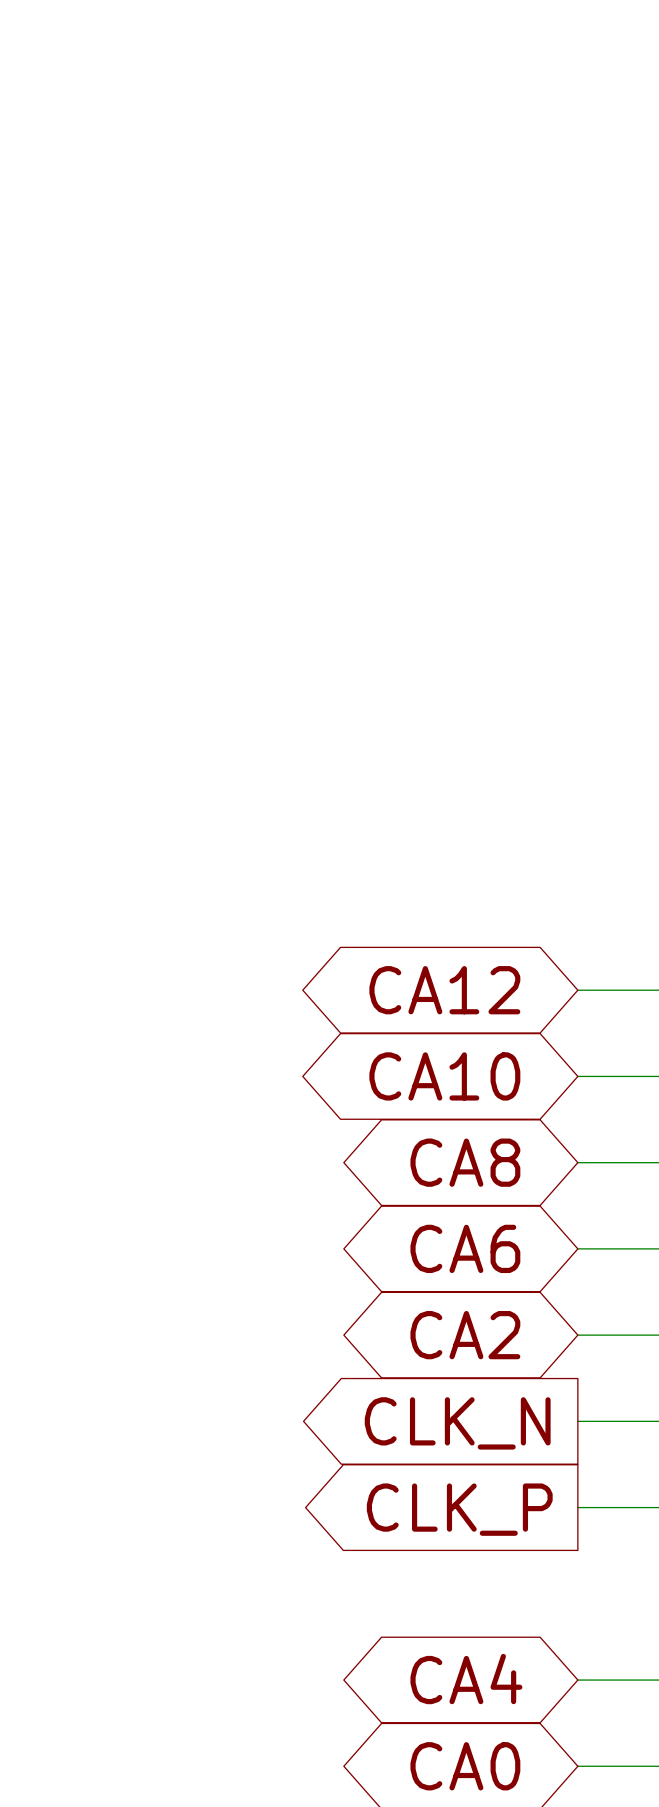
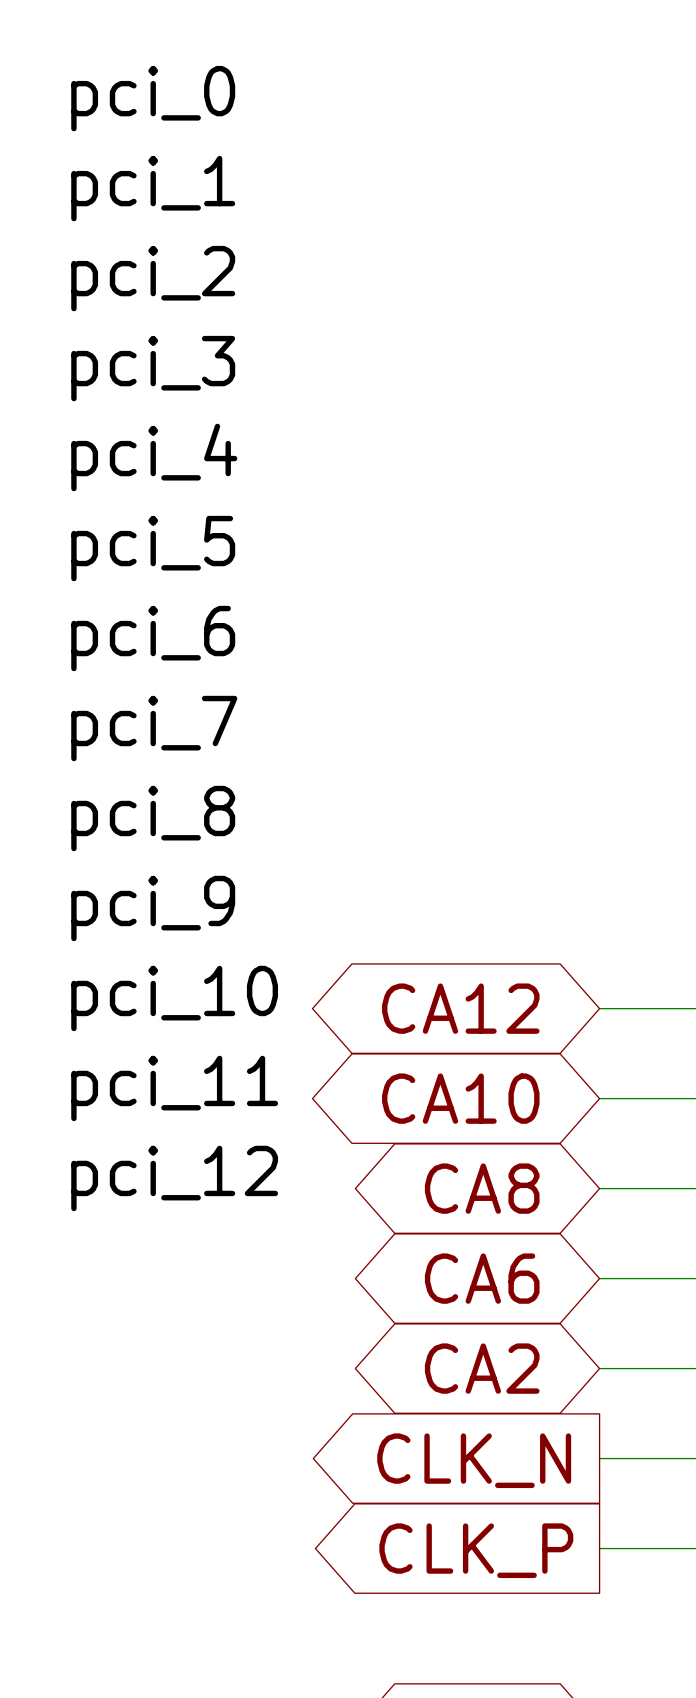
label: none -> pci_0 (153, 98)
label: none -> pci_1 (153, 188)
label: none -> pci_2 (153, 278)
label: none -> pci_3 (153, 368)
label: none -> pci_4 (154, 457)
label: none -> pci_5 (153, 548)
label: none -> pci_6 (153, 638)
label: none -> pci_7 (154, 728)
label: none -> pci_8 (153, 818)
label: none -> pci_9 (153, 908)
label: none -> pci_10 (174, 998)
label: none -> pci_11 (174, 1088)
label: none -> pci_12 (174, 1178)

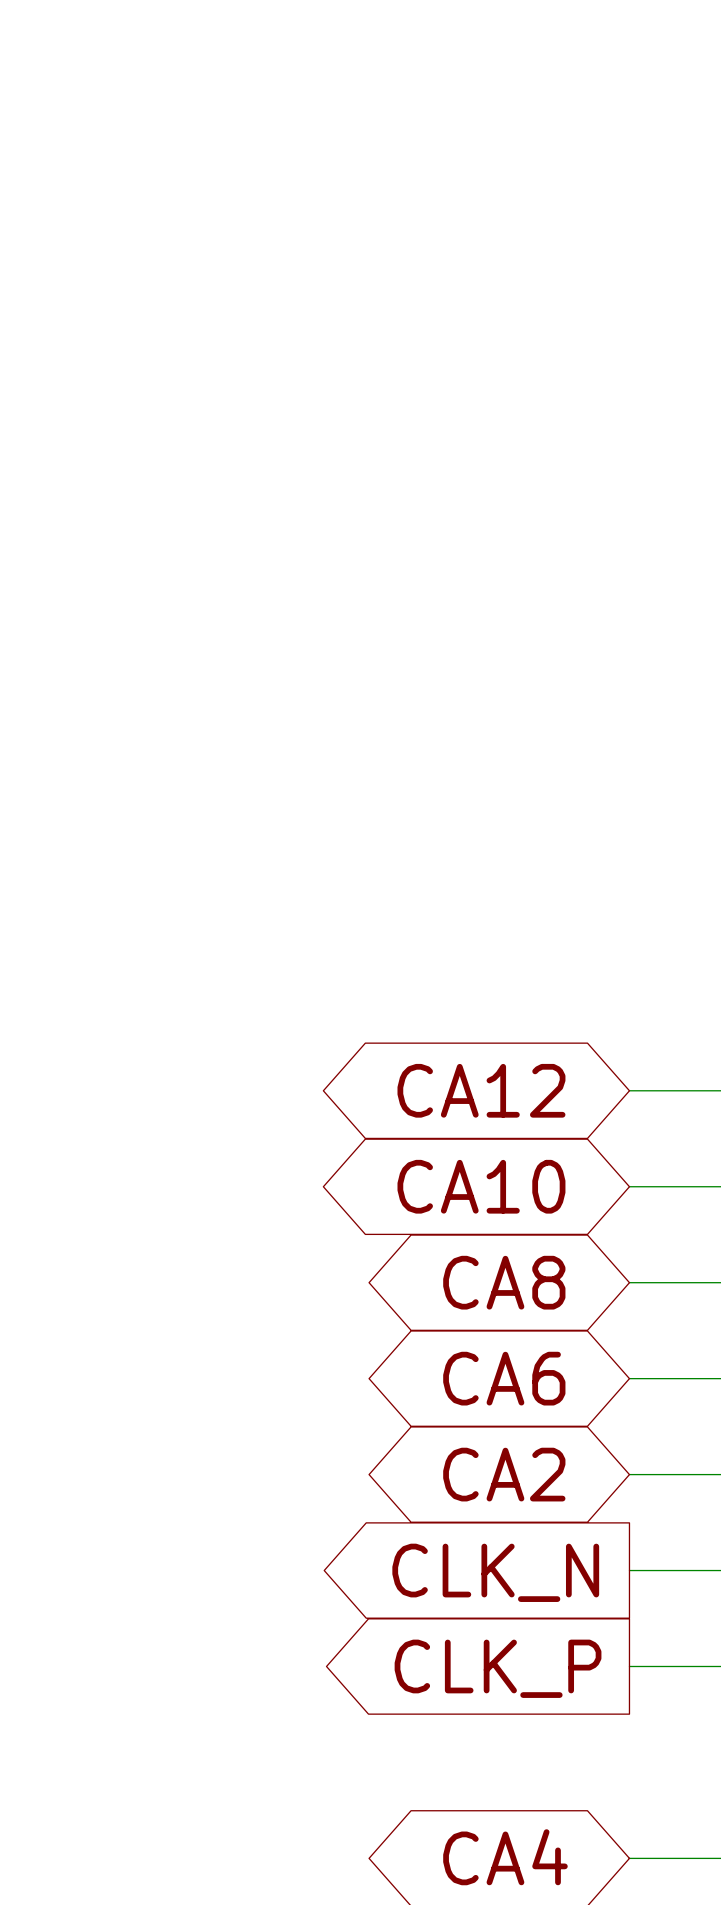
label: pci_0 (153, 98) -> none
label: pci_1 (153, 188) -> none
label: pci_2 (153, 278) -> none
label: pci_3 (153, 368) -> none
label: pci_4 (154, 457) -> none
label: pci_5 (153, 548) -> none
label: pci_6 (153, 638) -> none
label: pci_7 (154, 728) -> none
label: pci_8 (153, 818) -> none
label: pci_9 (153, 908) -> none
label: pci_10 (174, 998) -> none
label: pci_11 (174, 1088) -> none
label: pci_12 (174, 1178) -> none

